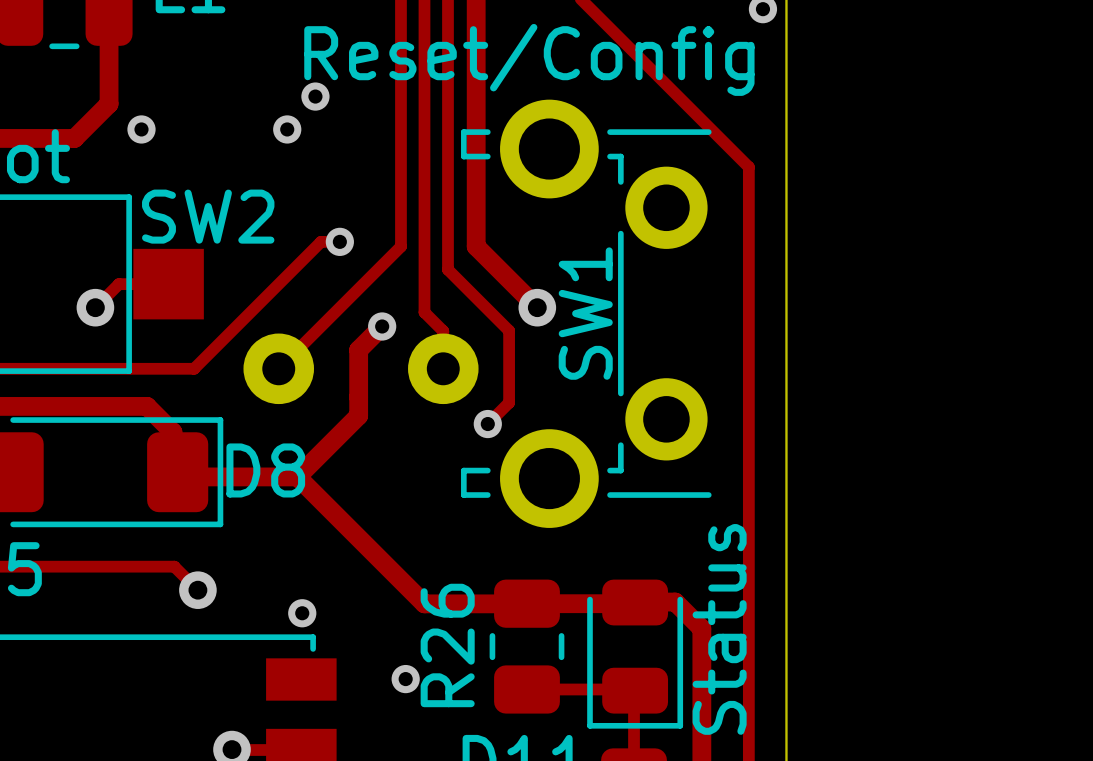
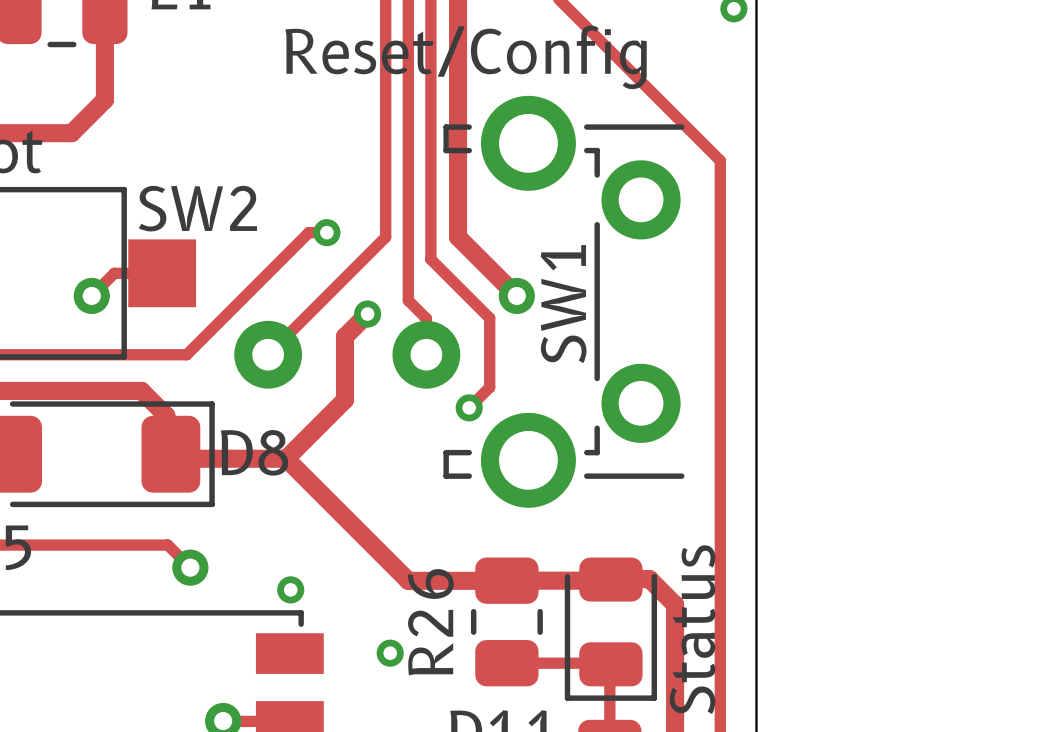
via: (315, 96) -> none
via: (141, 129) -> none
via: (287, 129) -> none

